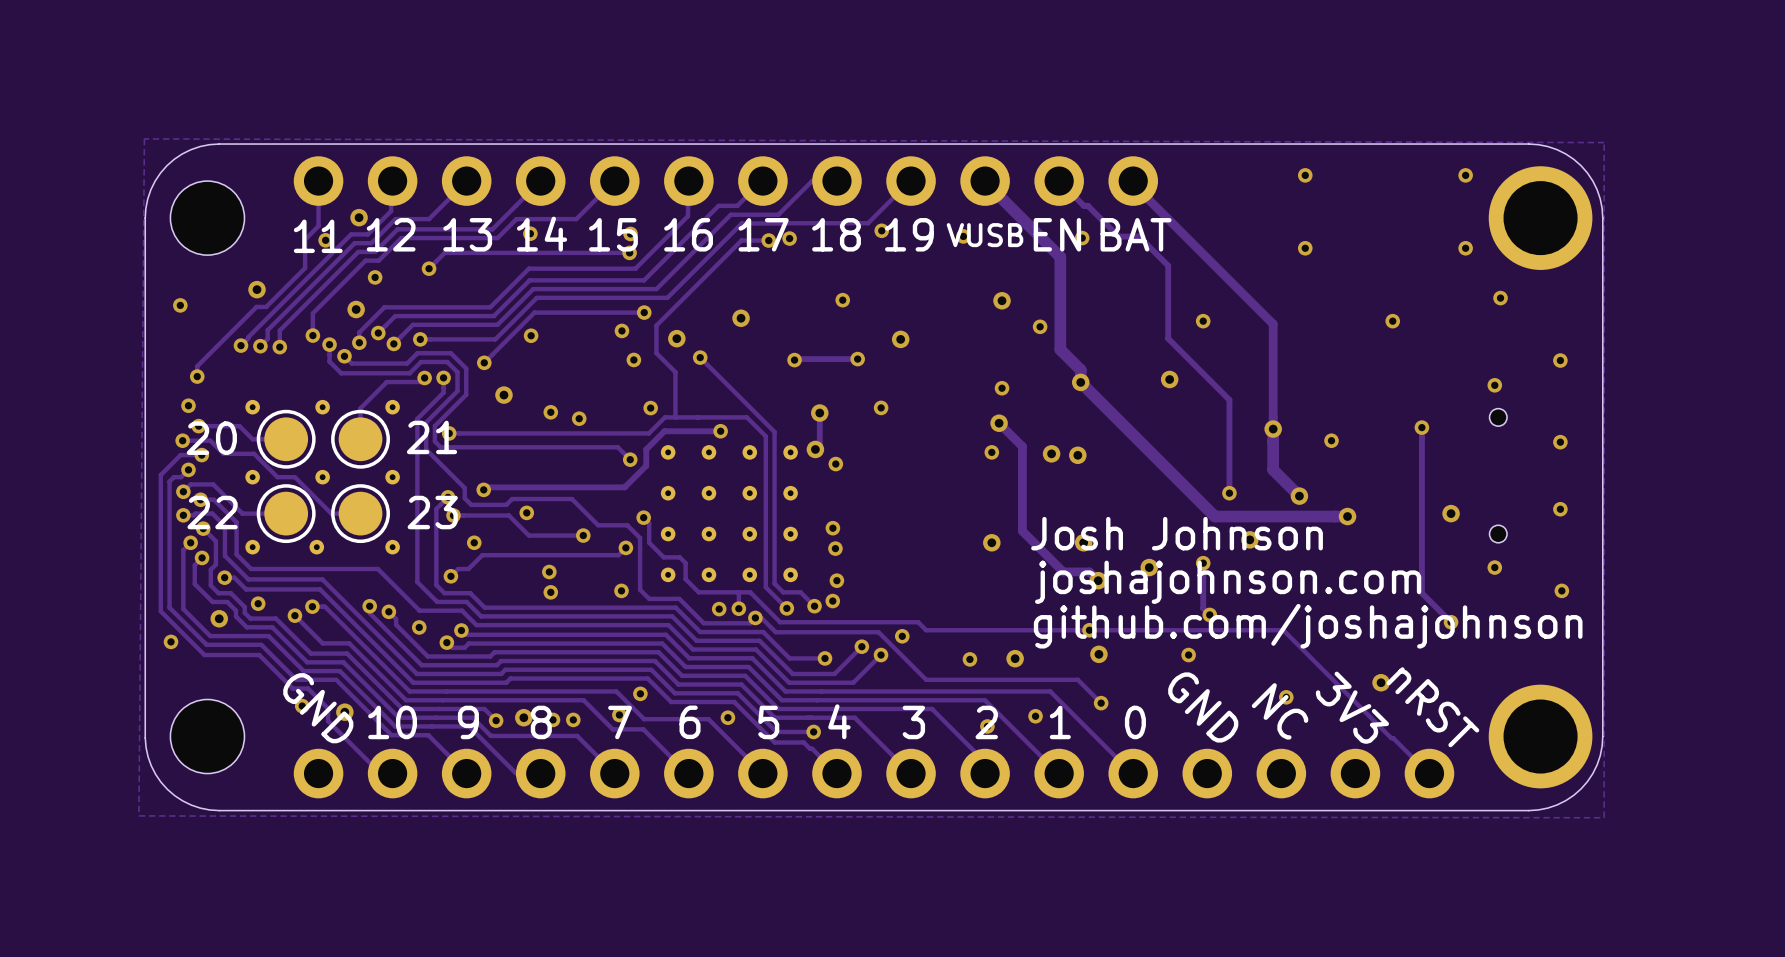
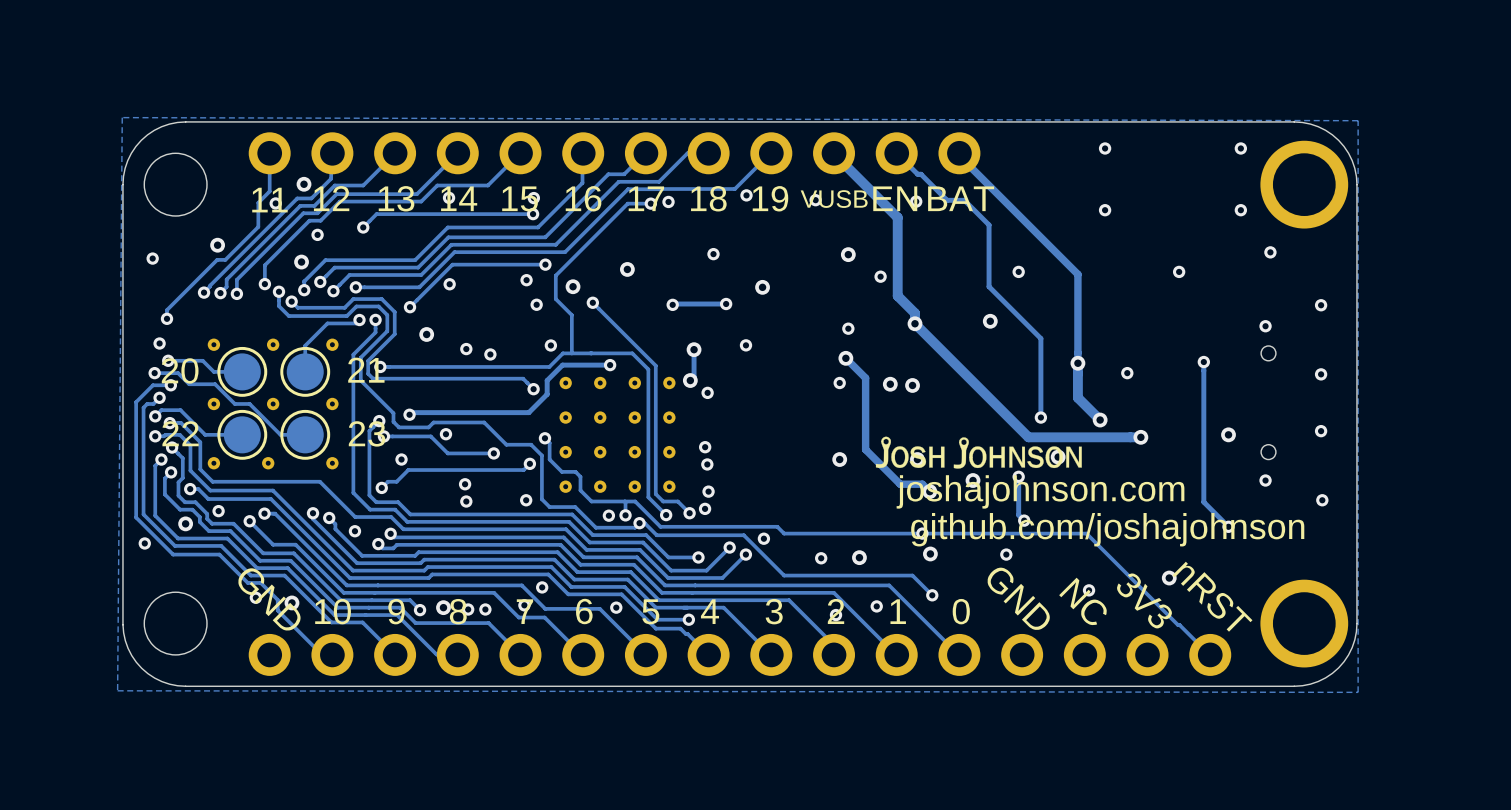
drawing: none -> [875, 436, 1082, 469]
drawing shape: [1031, 516, 1583, 649] -> [896, 475, 1305, 547]

